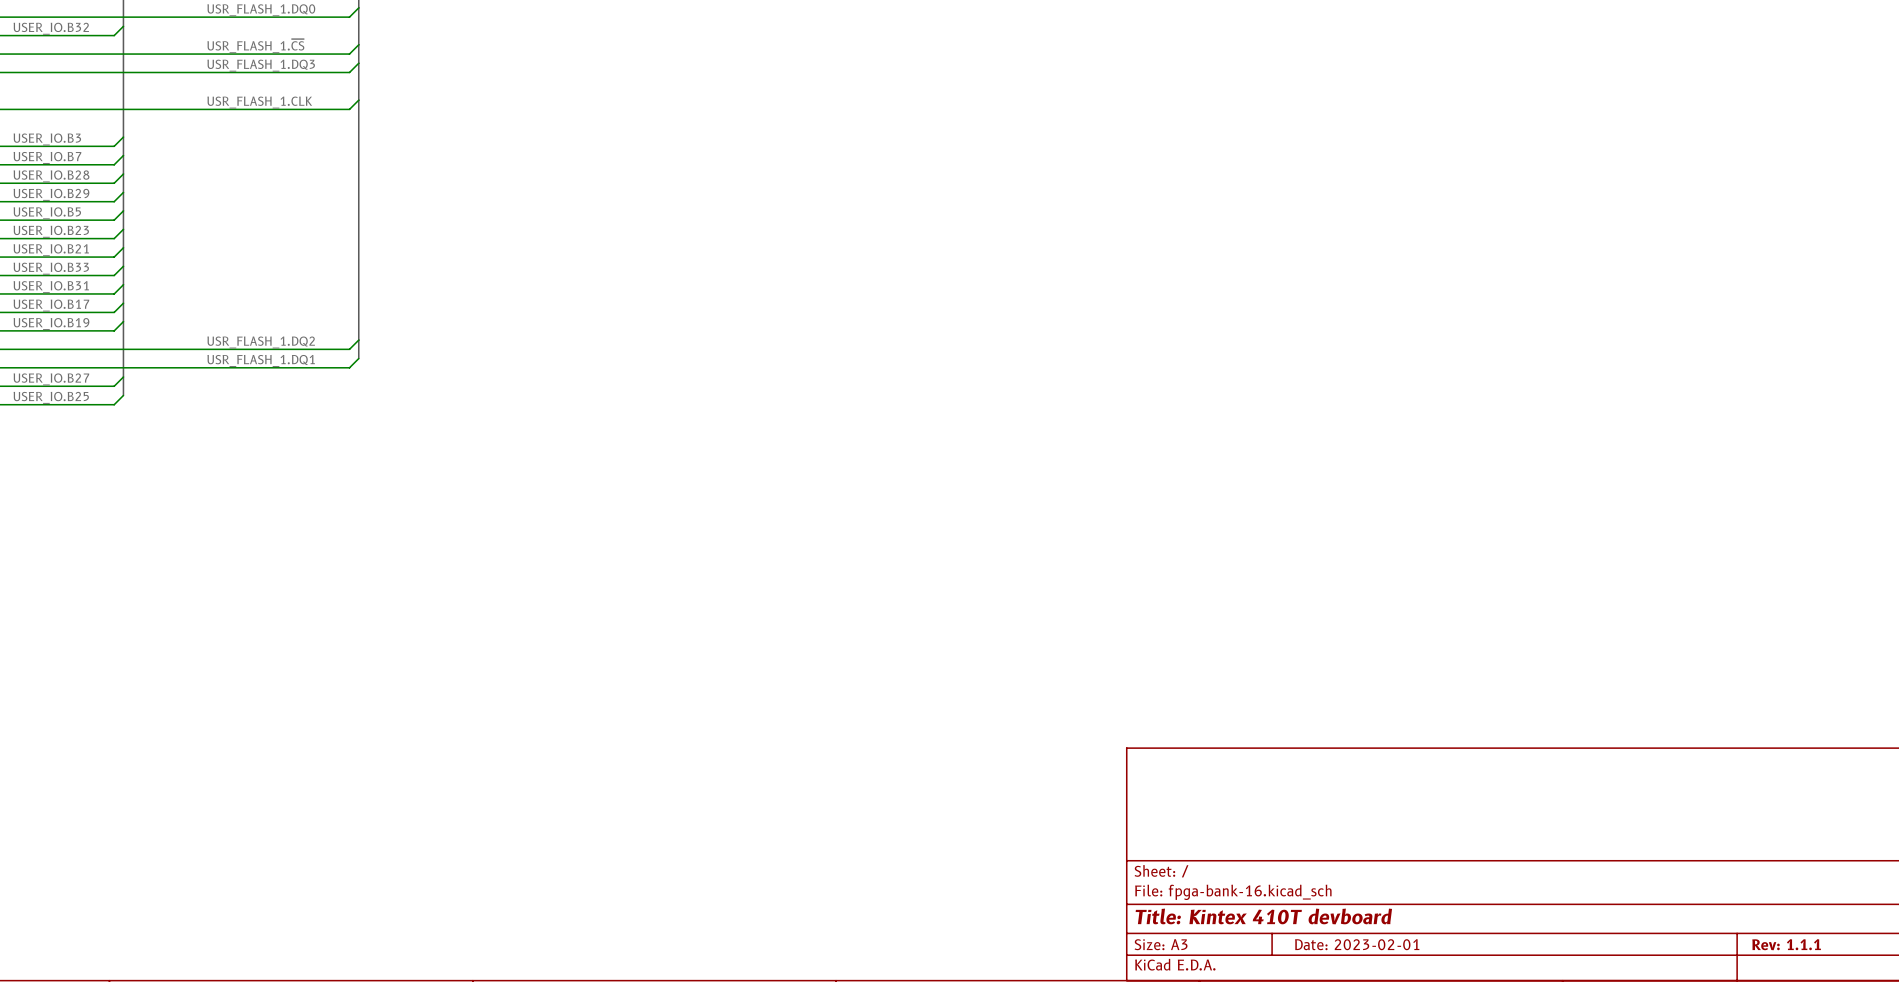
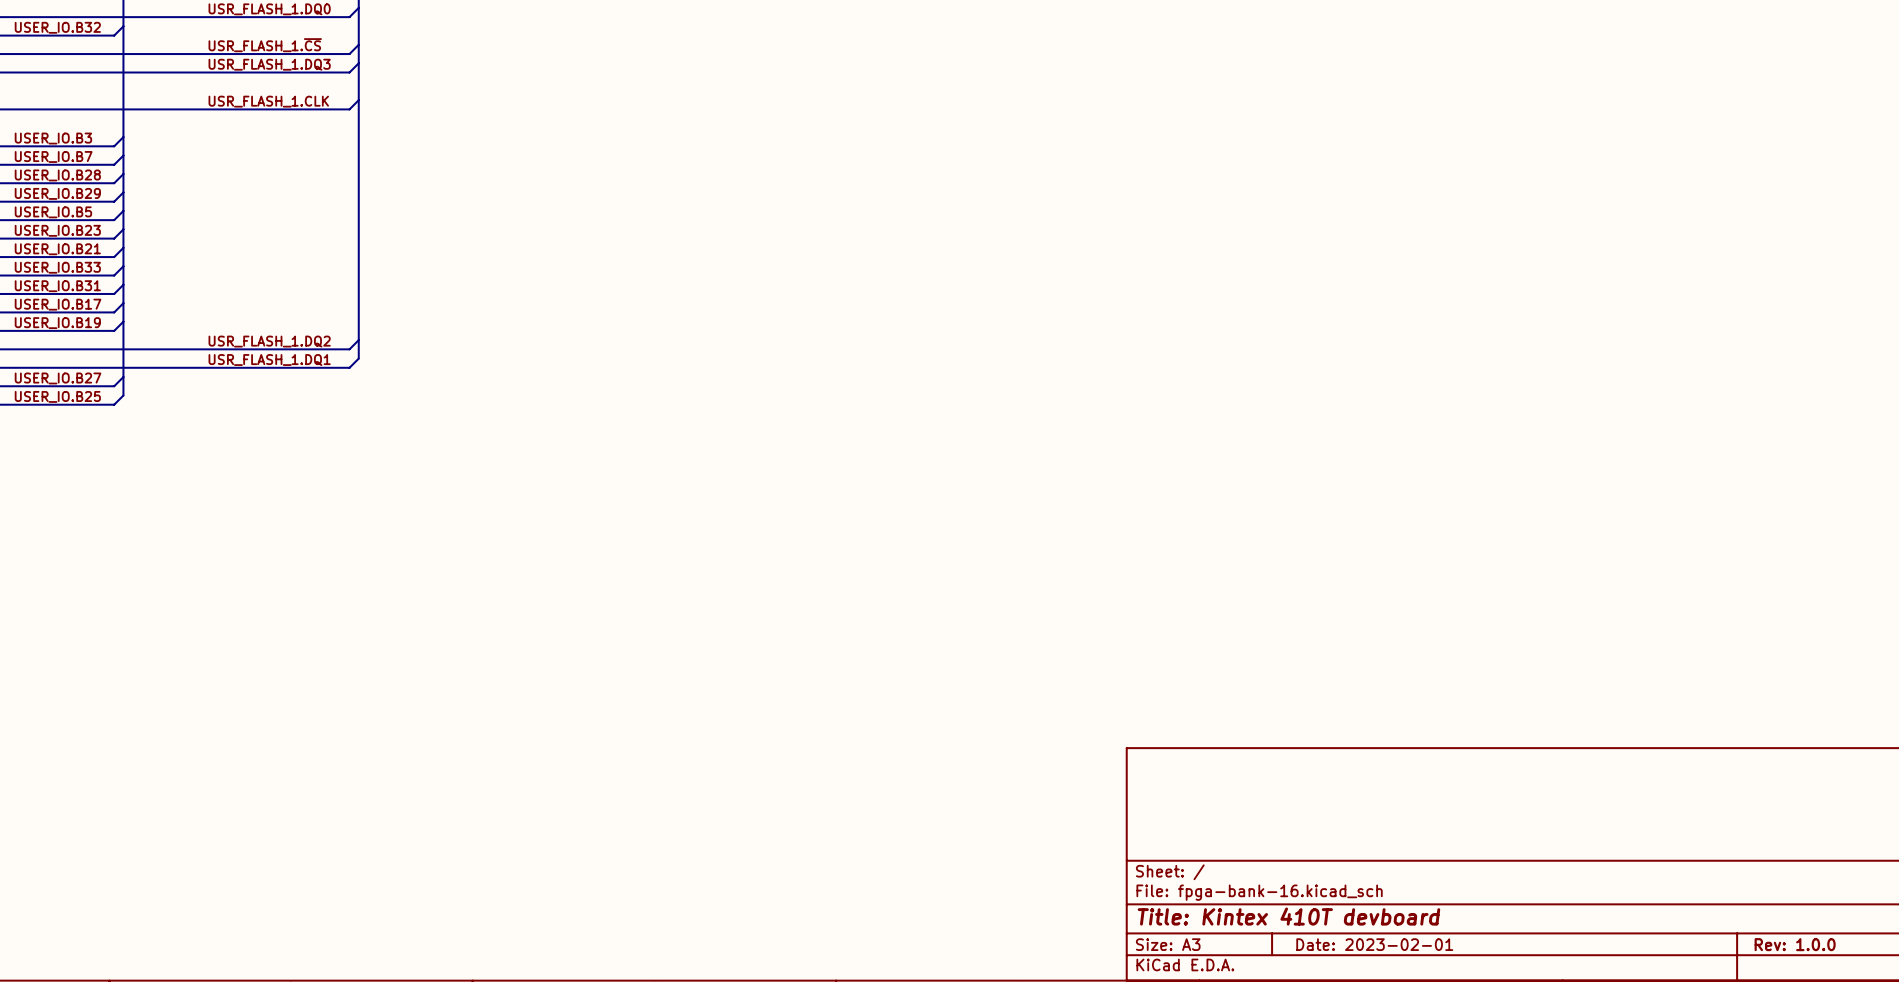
title block: Rev: 1.1.1 (1786, 944) -> Rev: 1.0.0 (1795, 944)

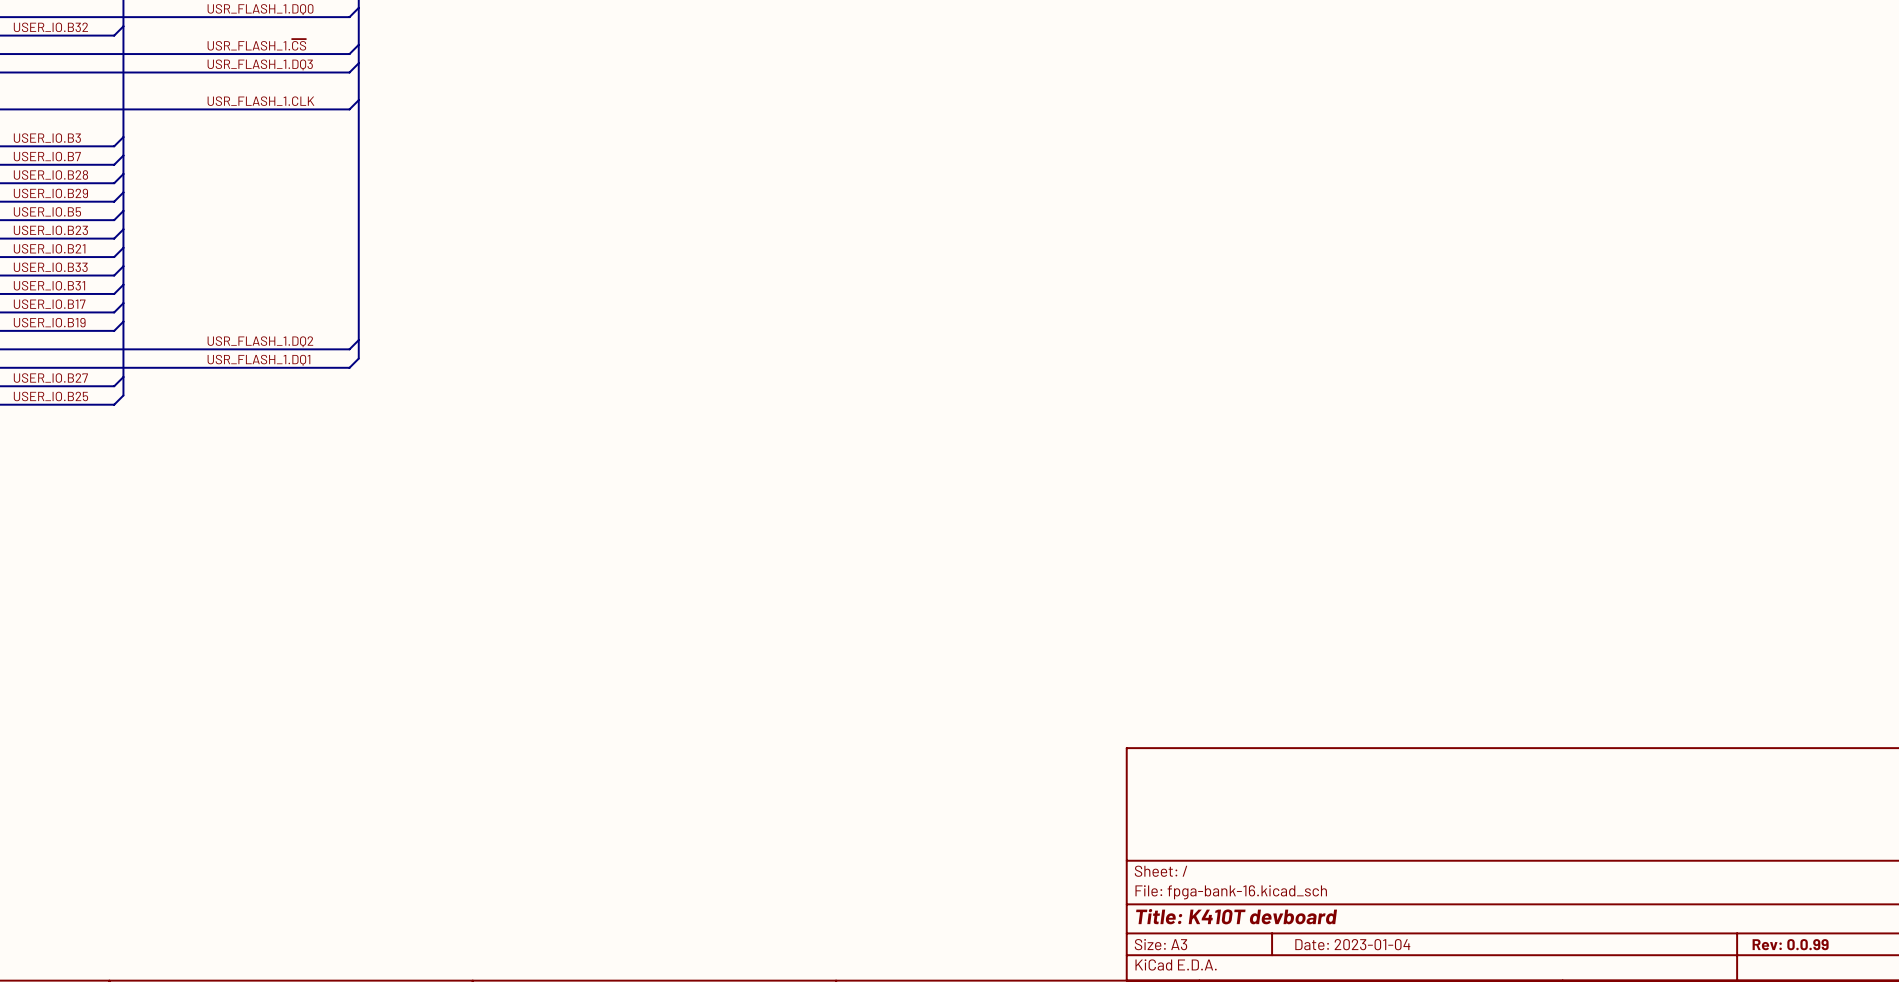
title block: Title: Kintex 410T devboard (1288, 916) -> Title: K410T devboard (1236, 916)
title block: Date: 2023-02-01 (1374, 944) -> Date: 2023-01-04 (1352, 944)
title block: Rev: 1.0.0 (1795, 944) -> Rev: 0.0.99 (1790, 944)

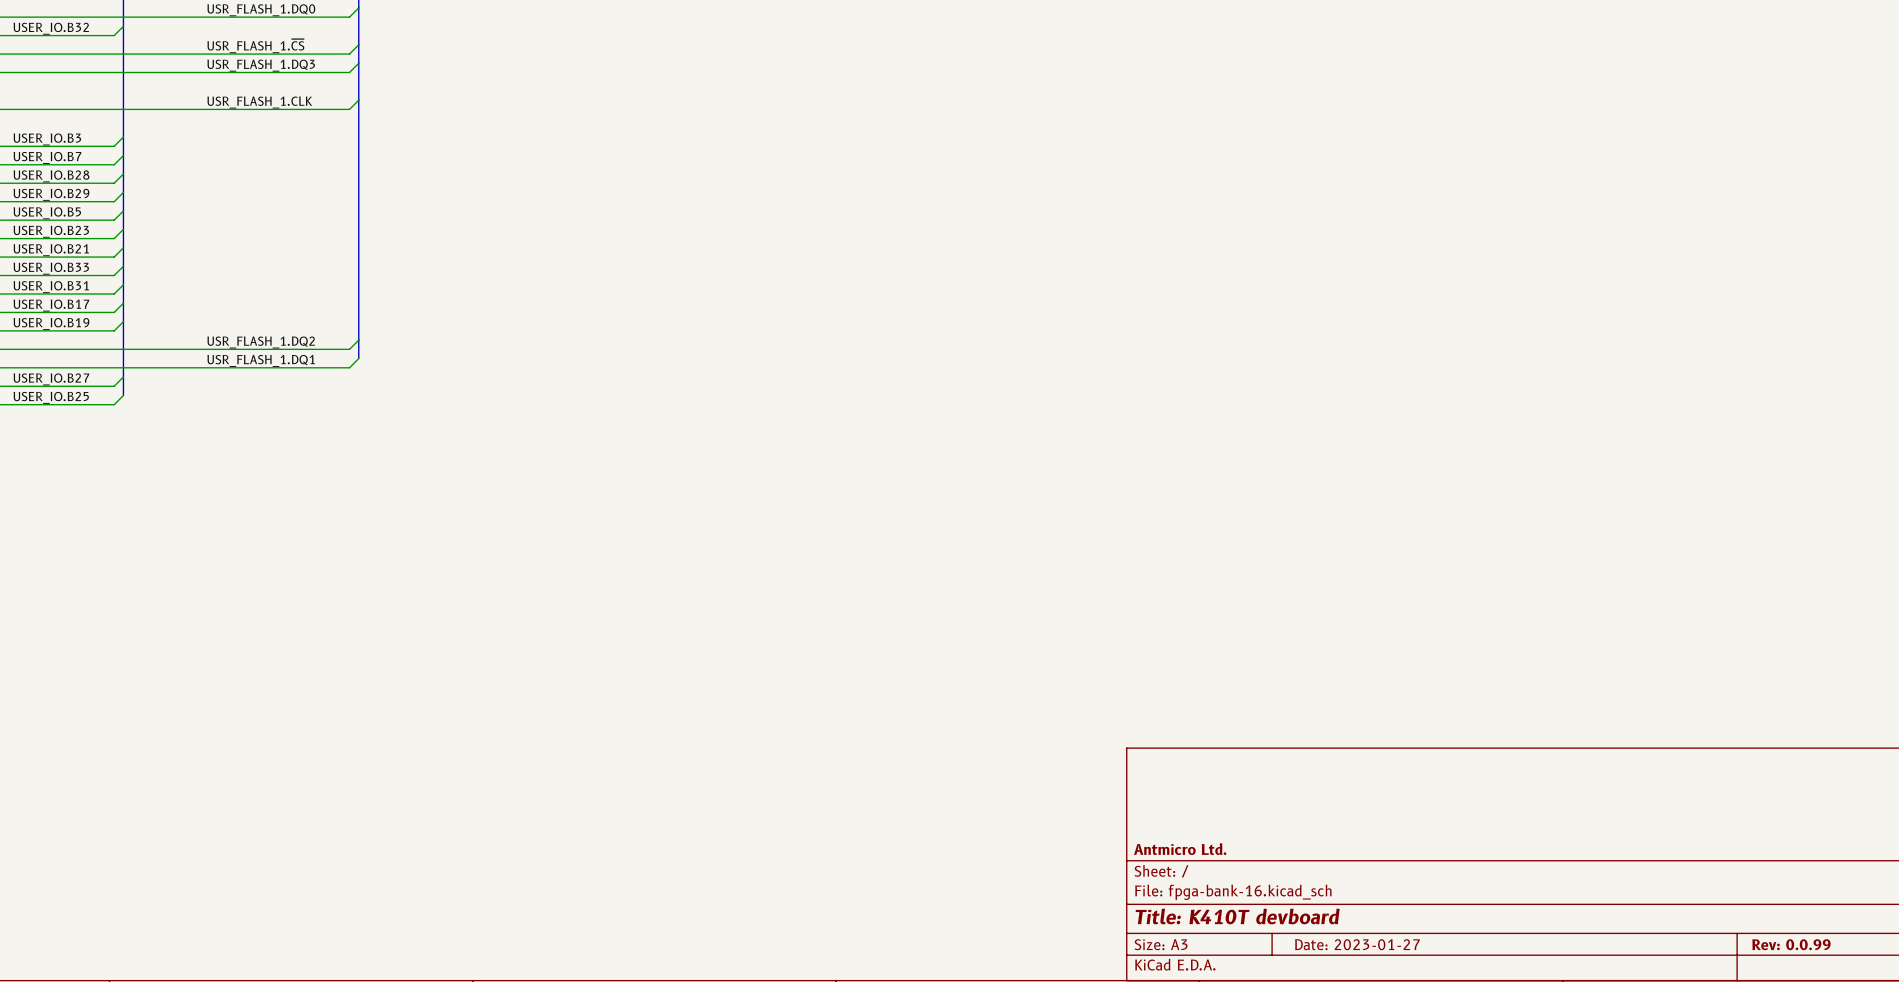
title block: none -> Antmicro Ltd. (1180, 849)
title block: Date: 2023-01-04 (1352, 944) -> Date: 2023-01-27 (1357, 944)

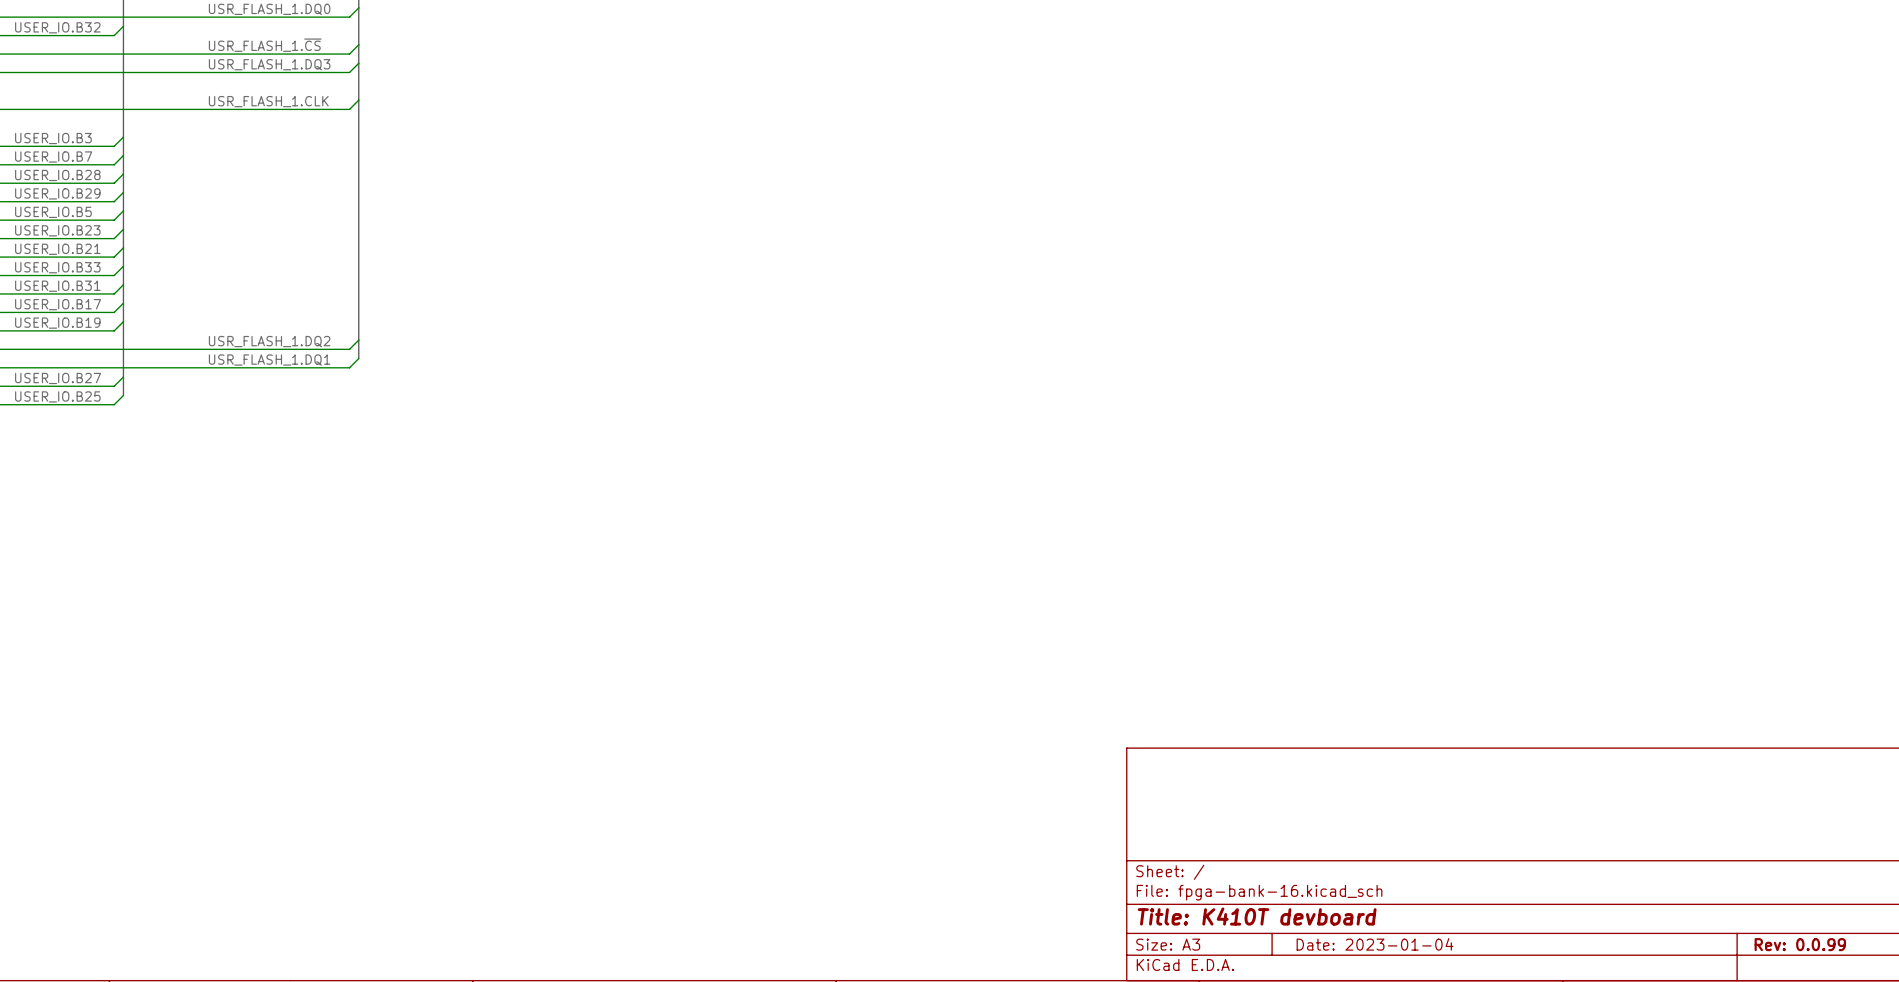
title block: Antmicro Ltd. (1180, 849) -> none
title block: Date: 2023-01-27 (1357, 944) -> Date: 2023-01-04 (1375, 944)

